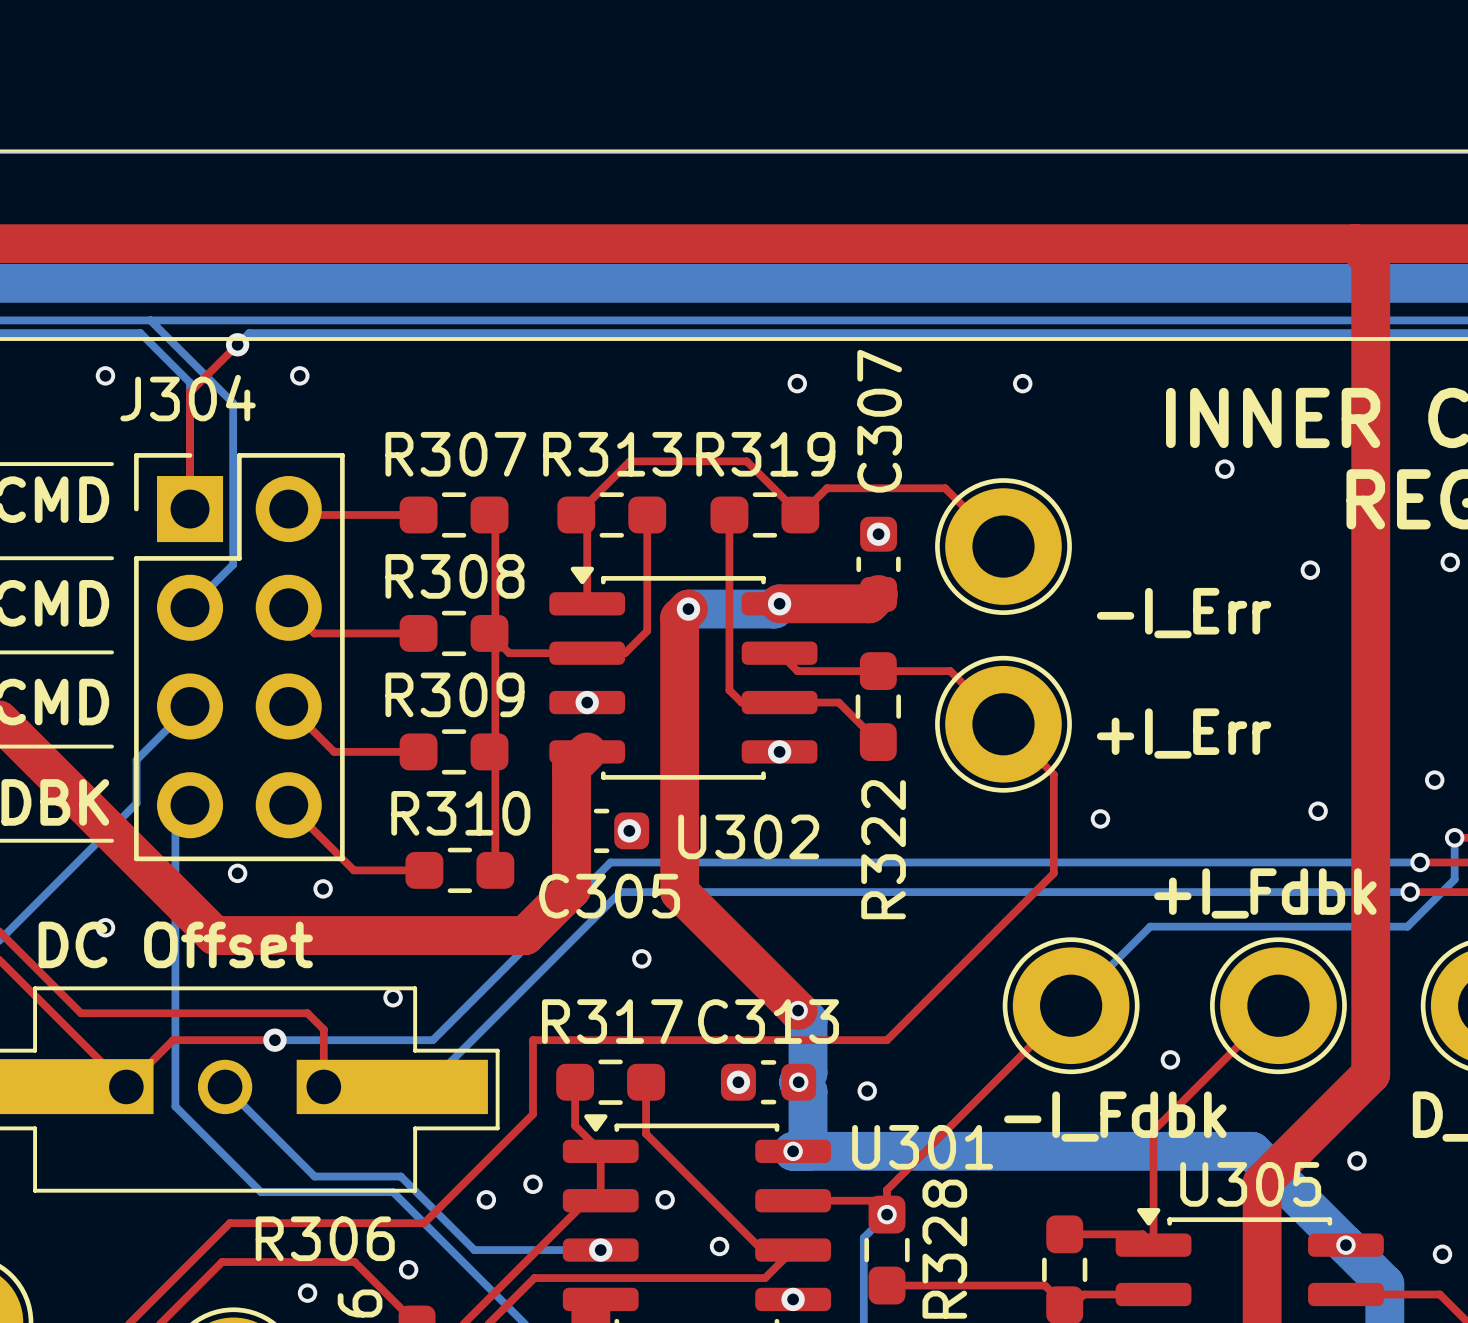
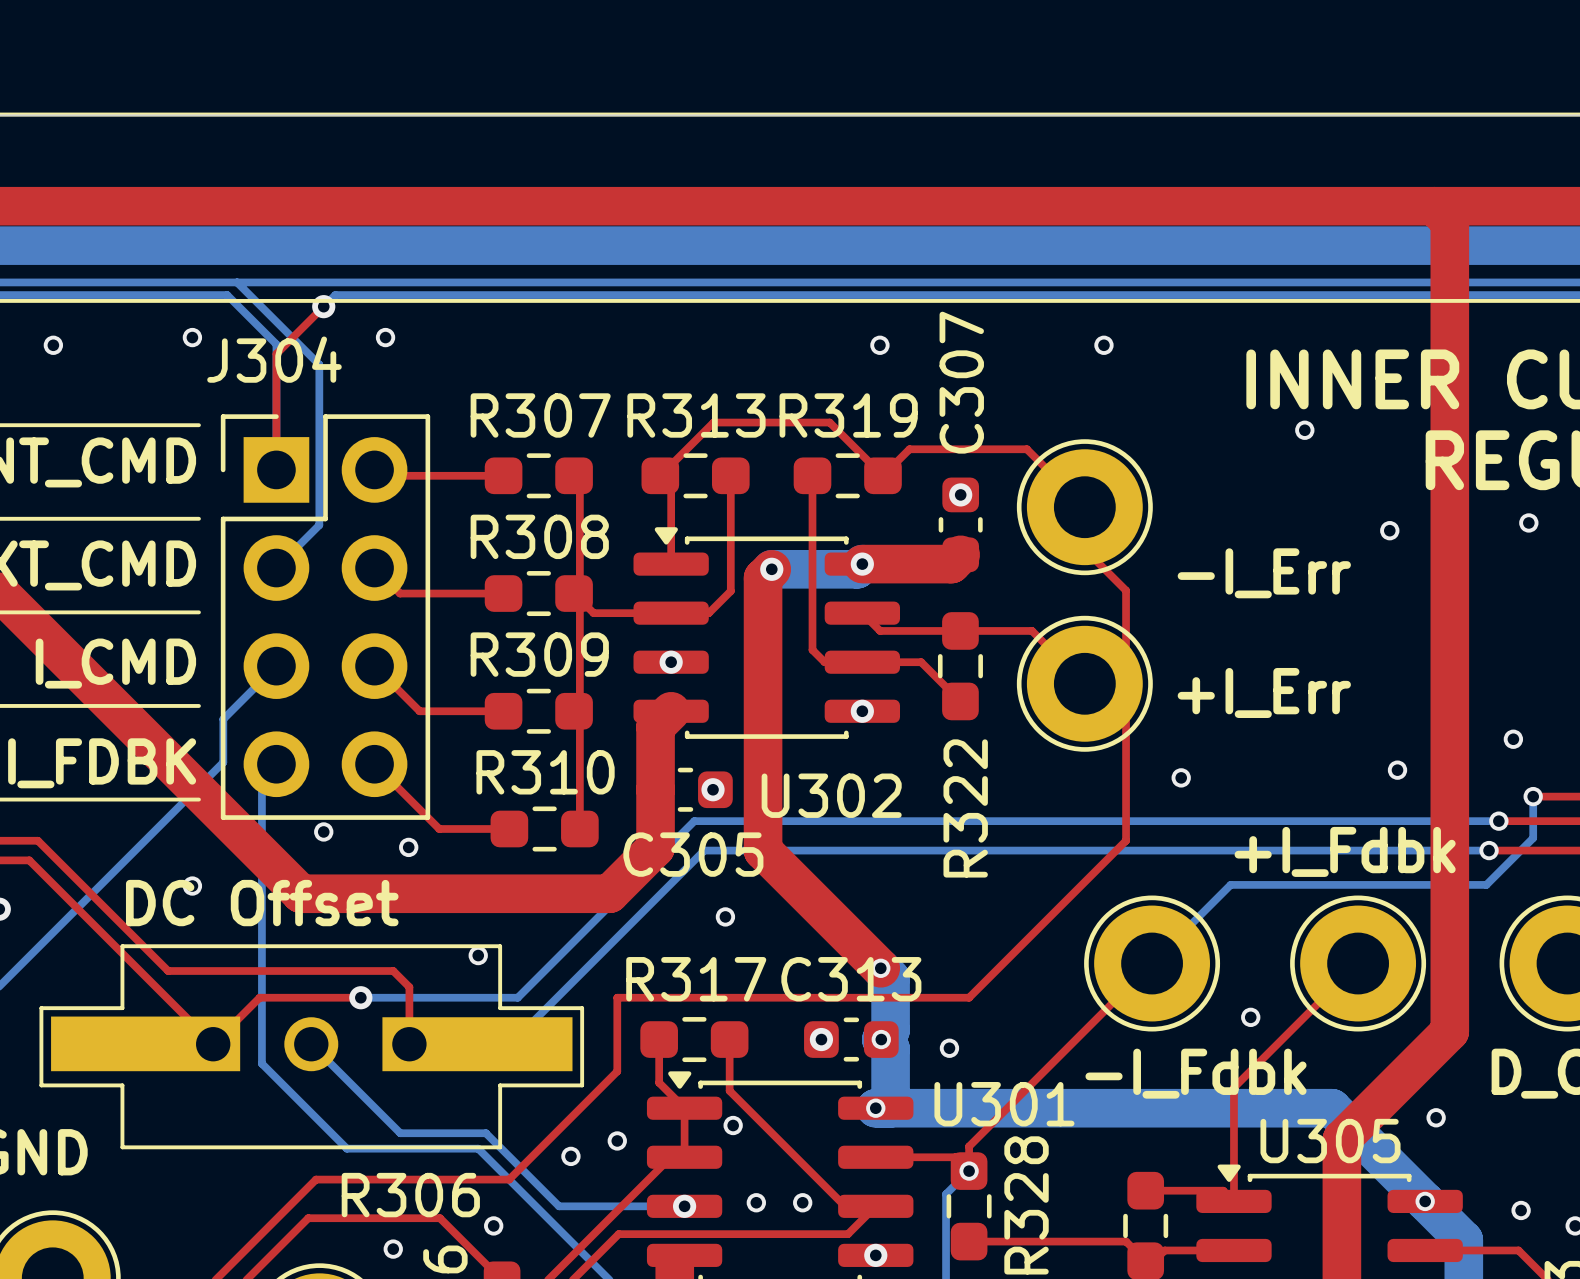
top track: (1003, 724) (1053, 774) (1053, 873) (1044, 882) -> (1070, 534) (1126, 590) (1126, 840)
via: none -> (733, 1125)
via: (665, 1199) -> none
via: none -> (756, 1202)

